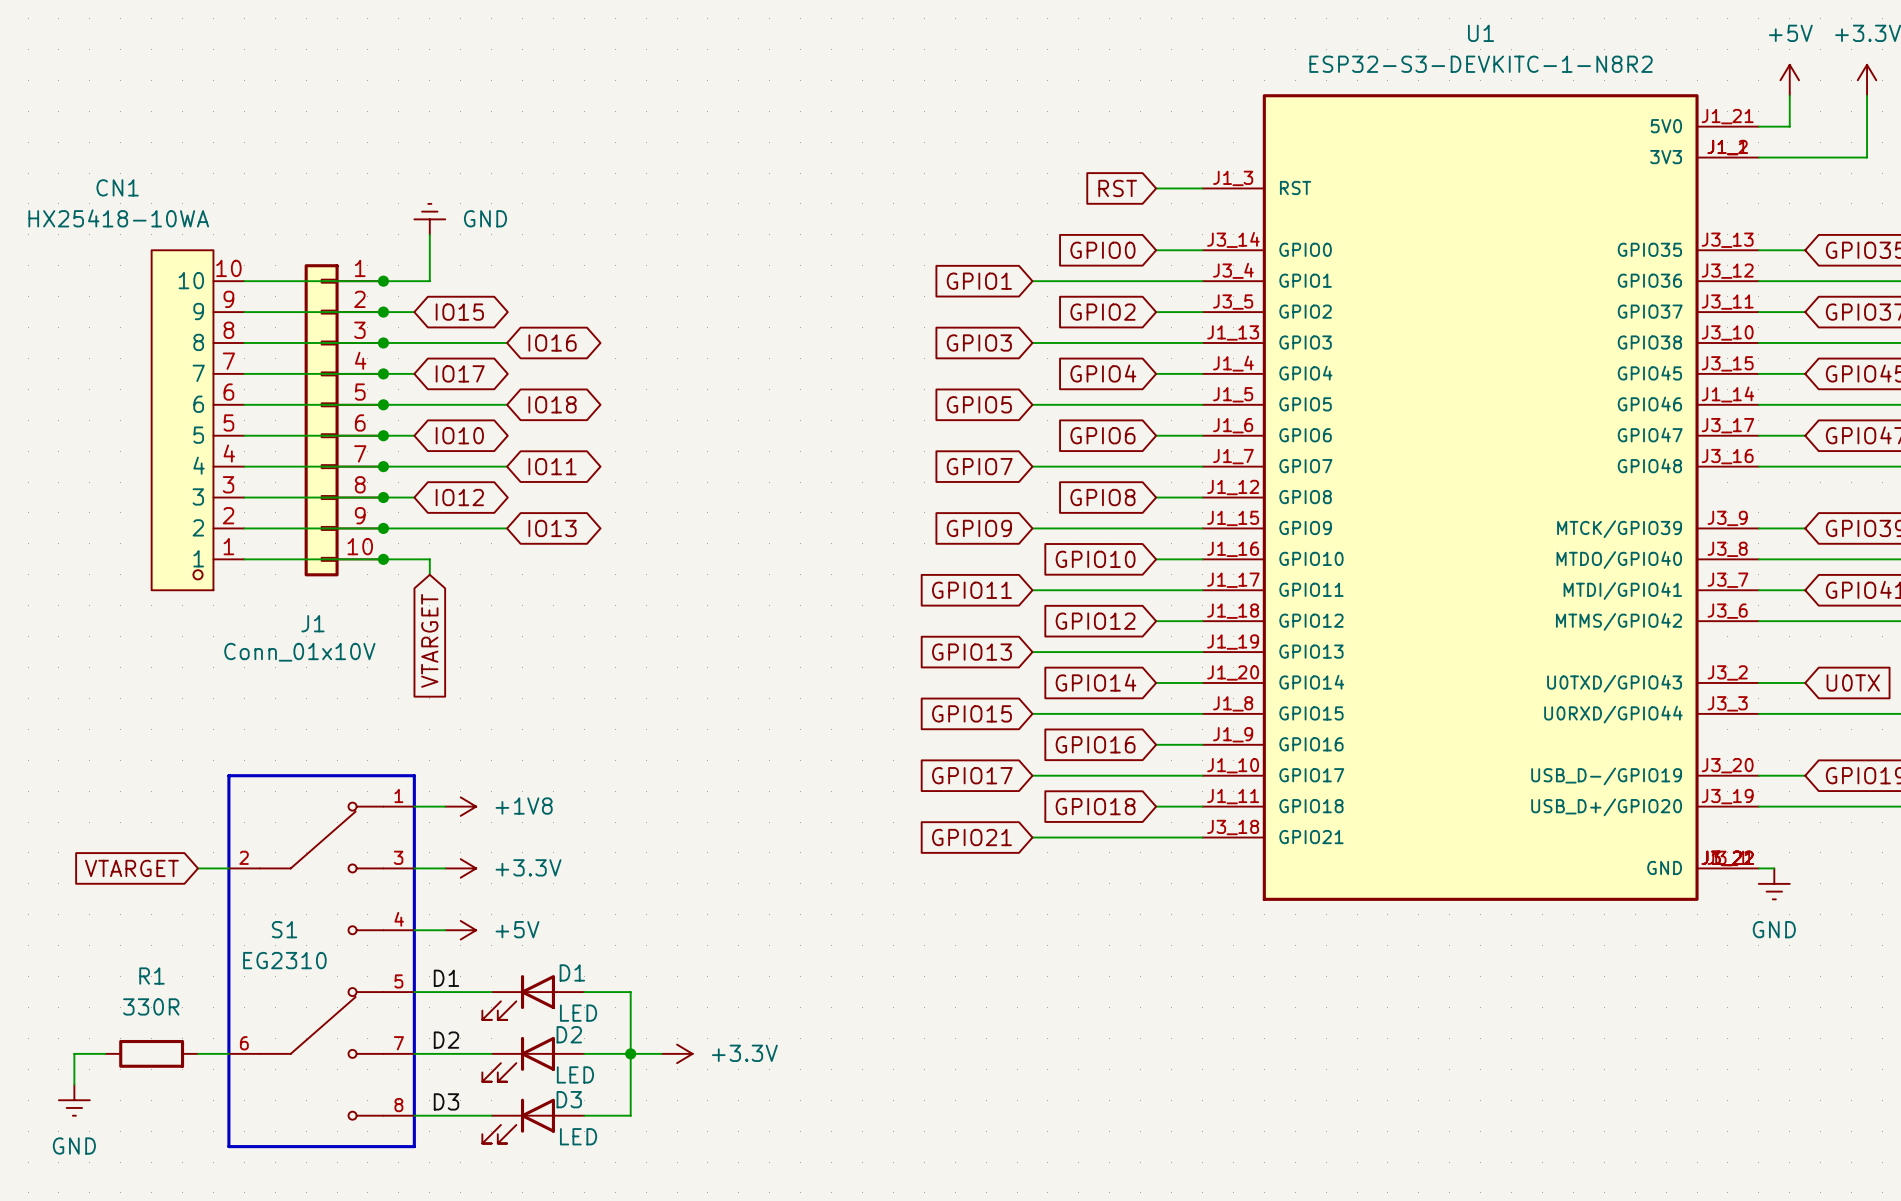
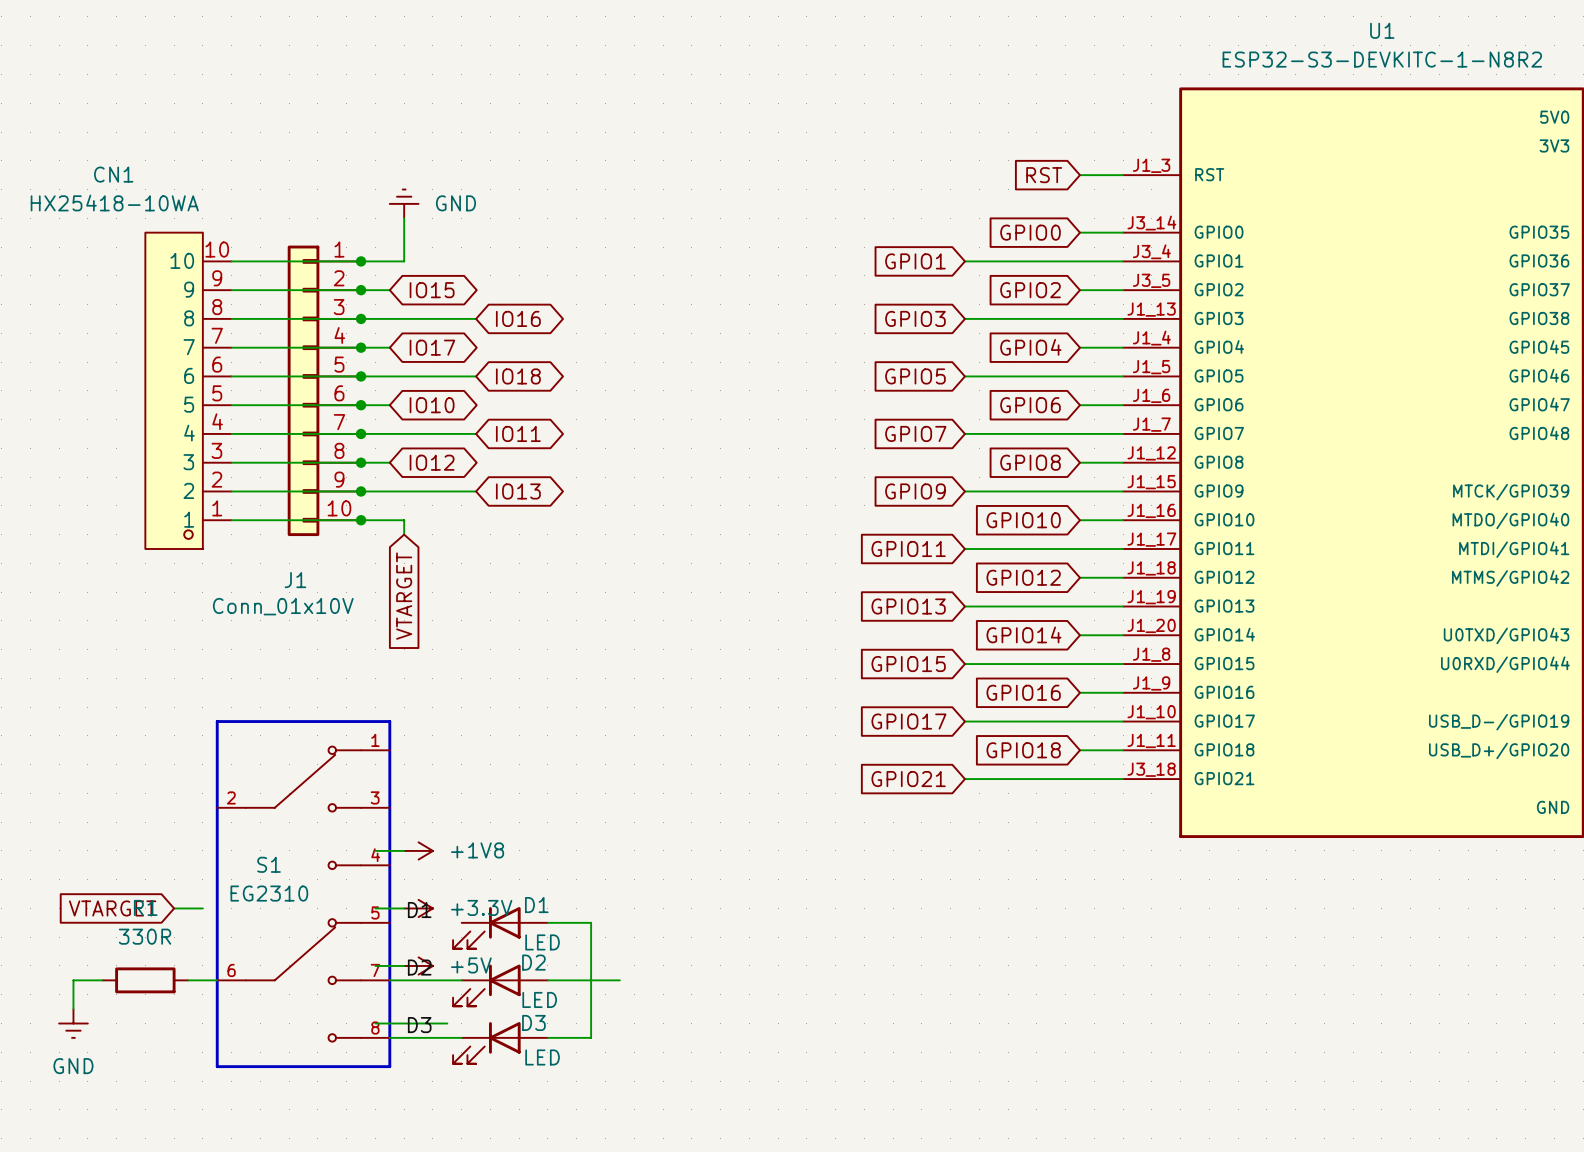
wire: (414, 806) (445, 806) -> (375, 850) (404, 850)
power symbol position: +1V8 (460, 806) -> +1V8 (418, 850)
global label position: VTARGET (131, 868) -> VTARGET (112, 908)
wire: (197, 868) (228, 868) -> (174, 908) (202, 908)
wire: (414, 868) (445, 868) -> (375, 908) (404, 908)
power symbol position: +3.3V (460, 868) -> +3.3V (418, 908)
wire: (414, 930) (445, 930) -> (375, 965) (404, 965)
power symbol position: +5V (460, 930) -> +5V (418, 965)
wire: (414, 992) (491, 992) -> (375, 1023) (447, 1023)
junction: (630, 1053) -> none
power symbol: +3.3V (677, 1053) -> none

